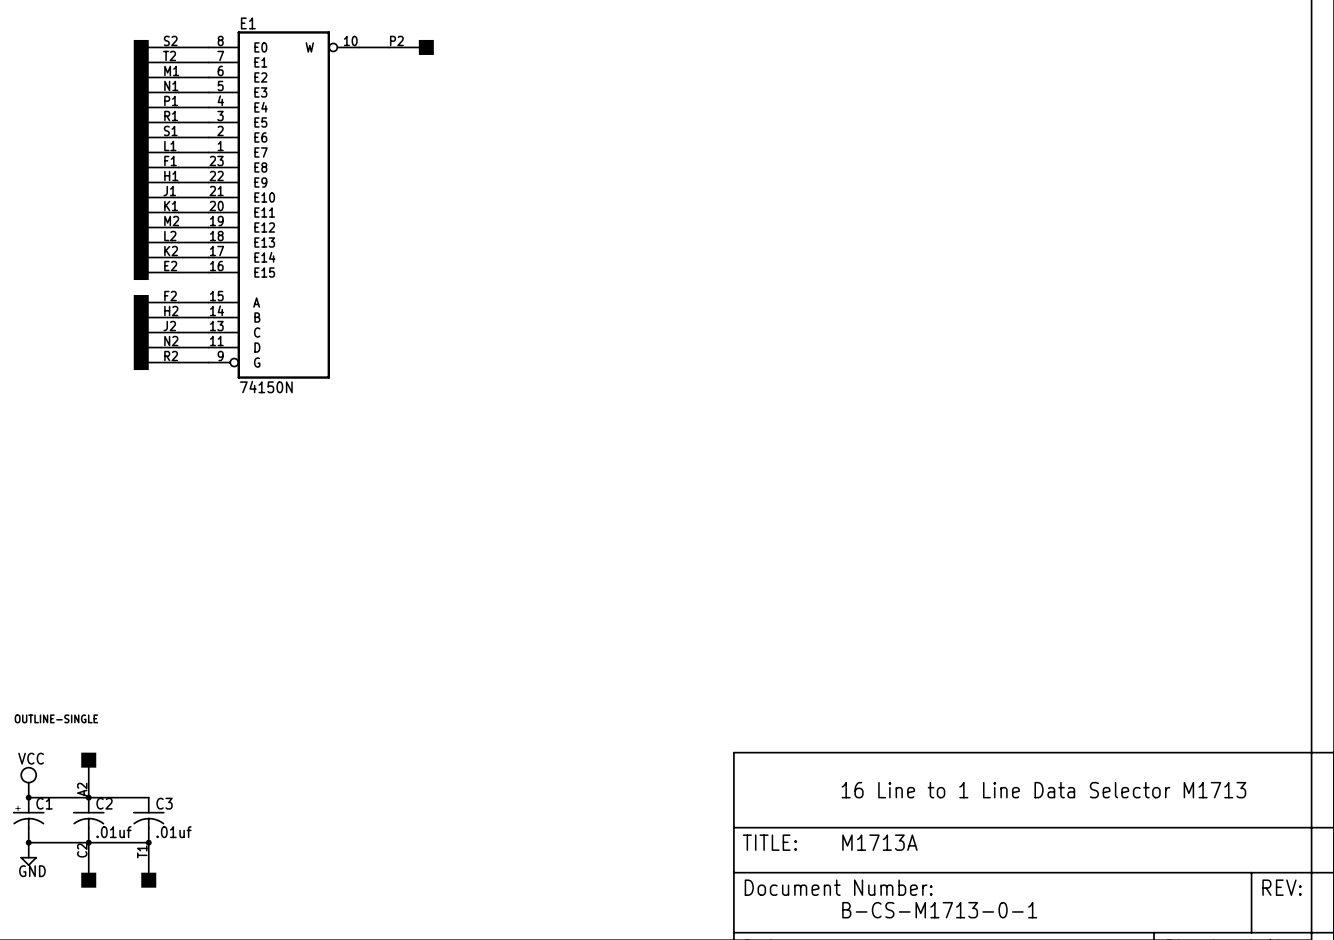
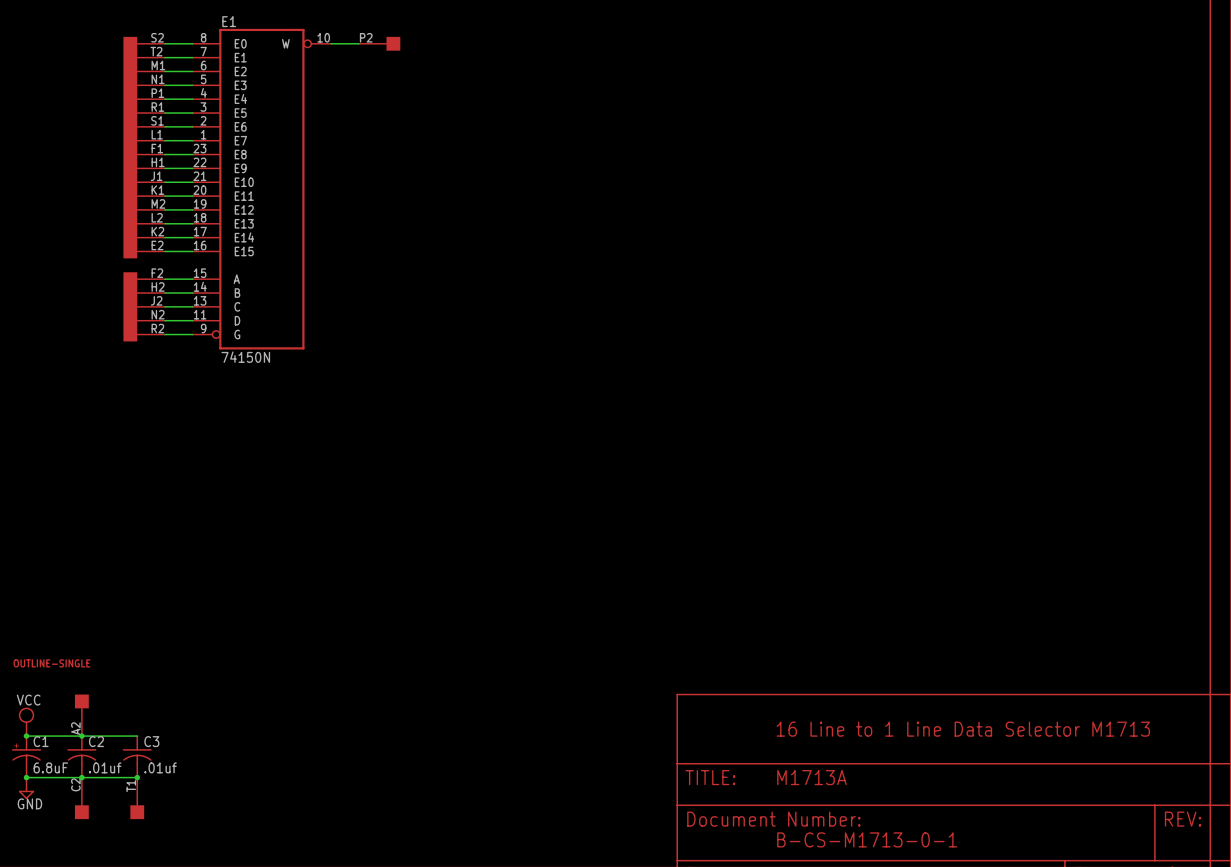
C1 value: none -> 6.8uF (50, 767)

